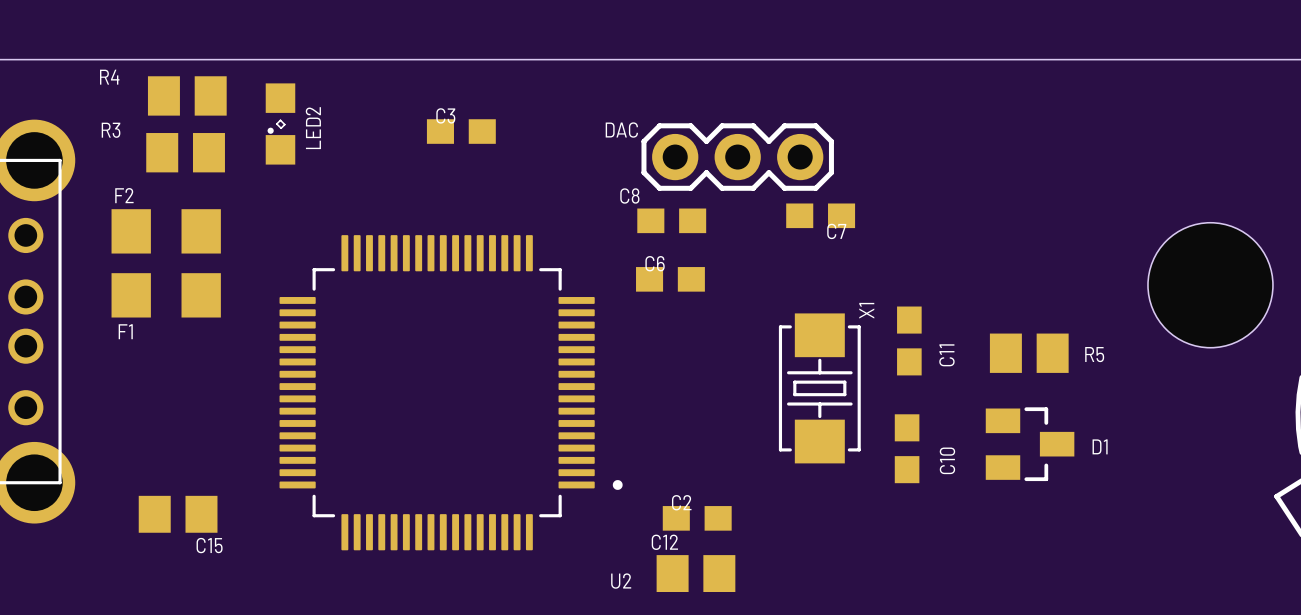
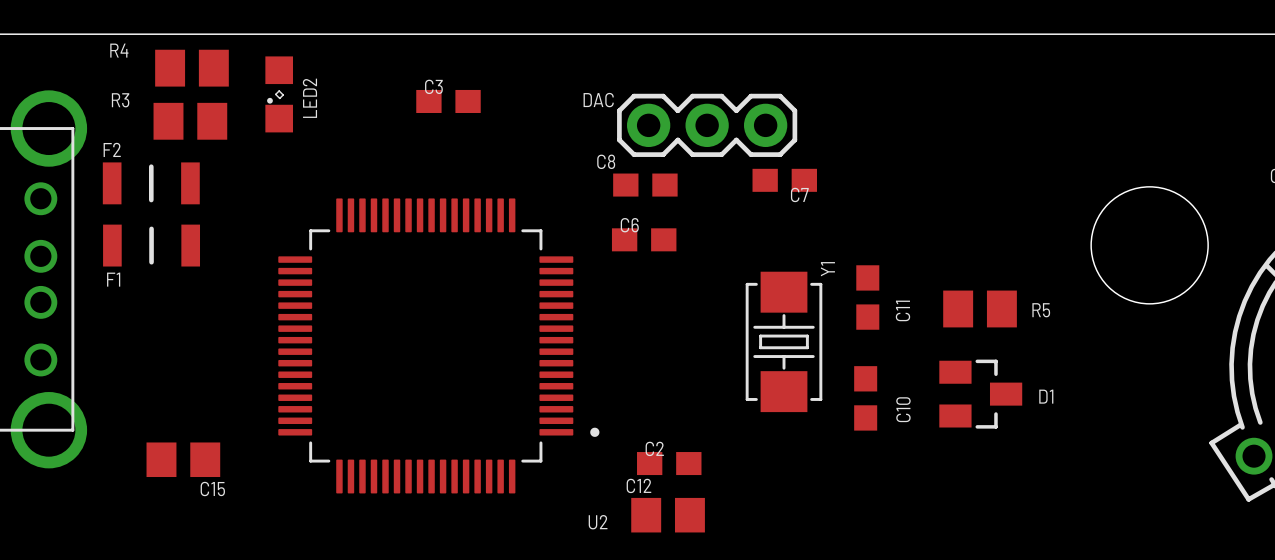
F2 footprint: [111, 209, 221, 254] -> [102, 162, 200, 205]
F1 footprint: [111, 273, 221, 318] -> [103, 224, 201, 267]
X1 name: X1 (866, 310) -> Y1 (827, 269)

